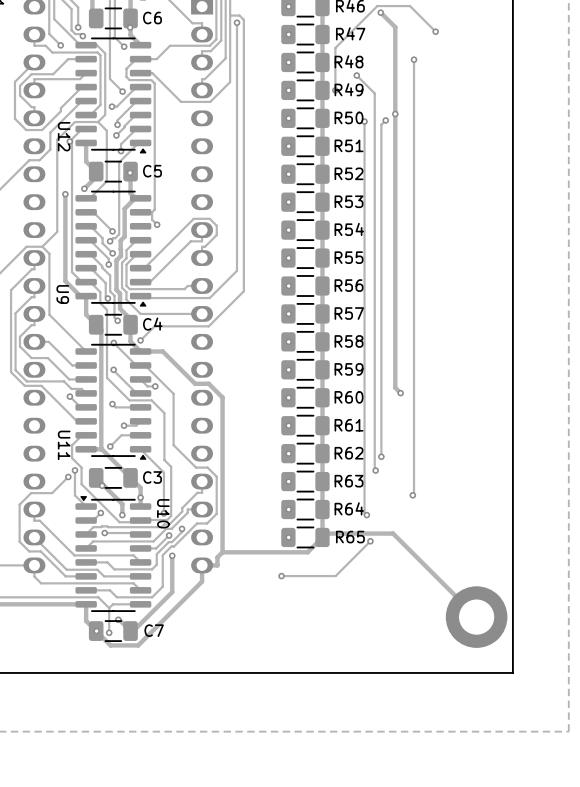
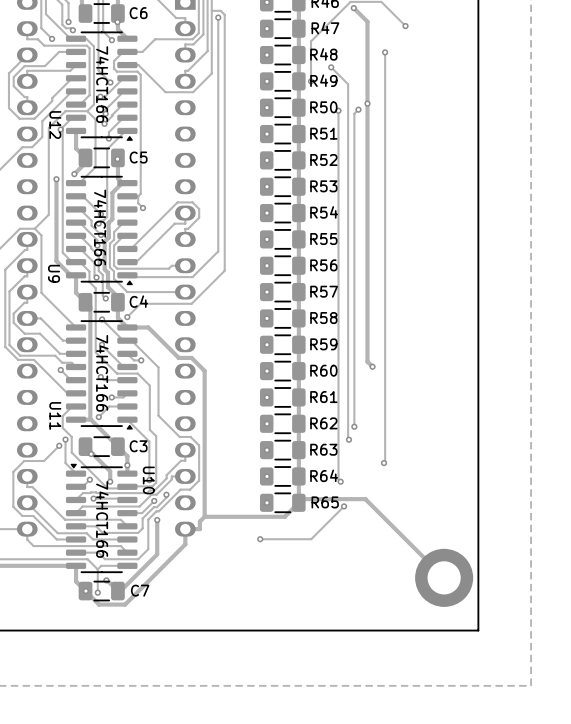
U12 value: none -> 74HCT166 (102, 84)
U9 value: none -> 74HCT166 (100, 227)
U11 value: none -> 74HCT166 (102, 373)
U10 value: none -> 74HCT166 (102, 519)

